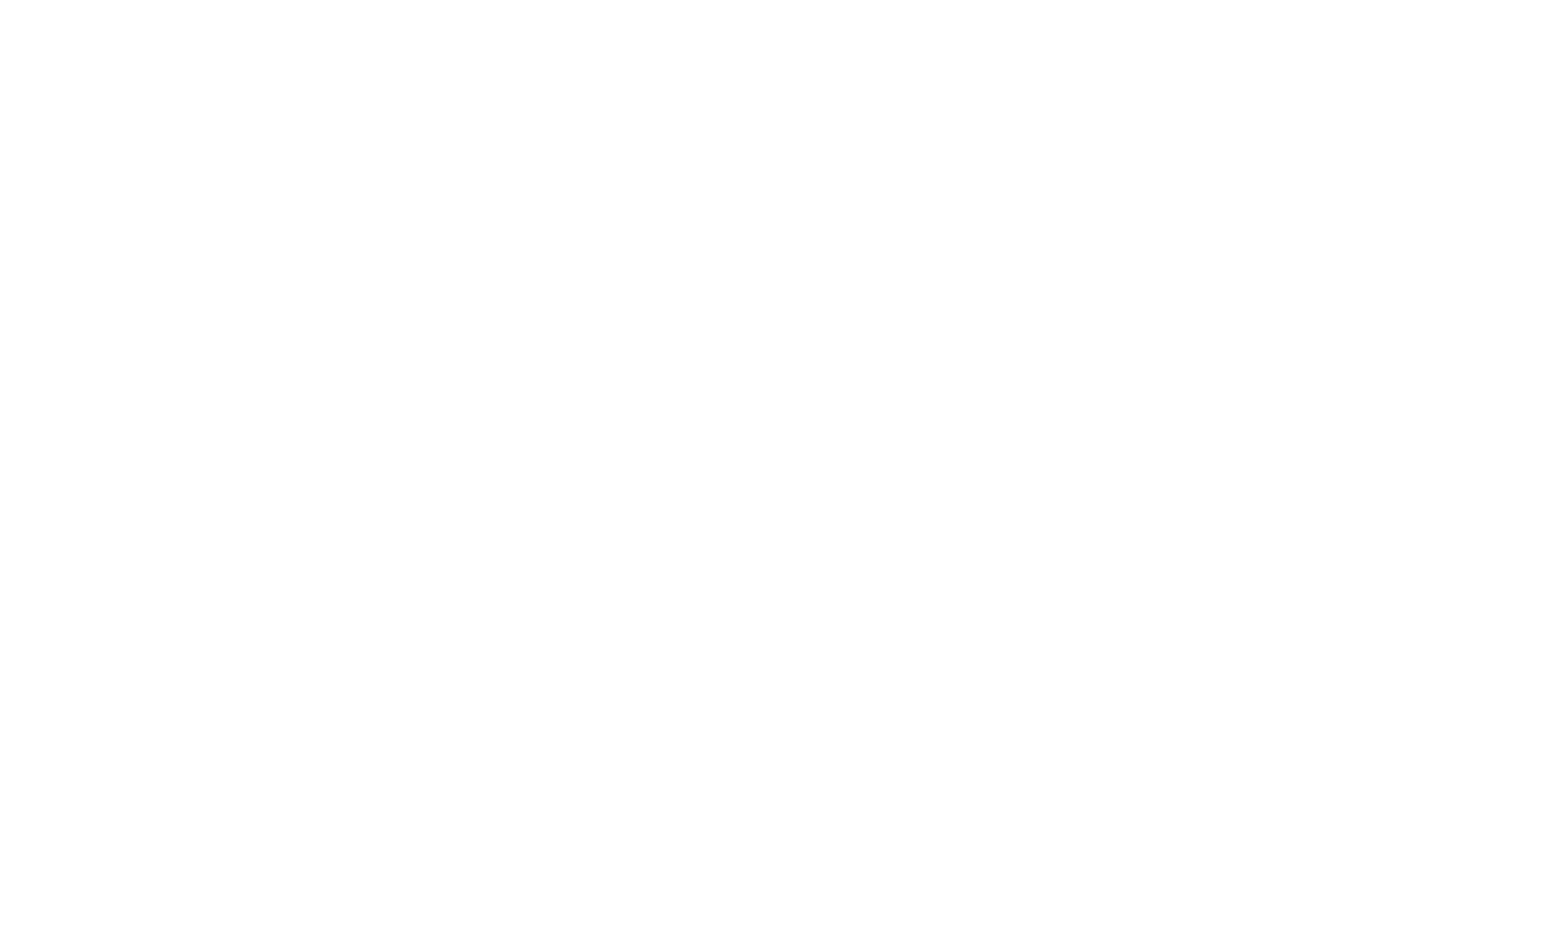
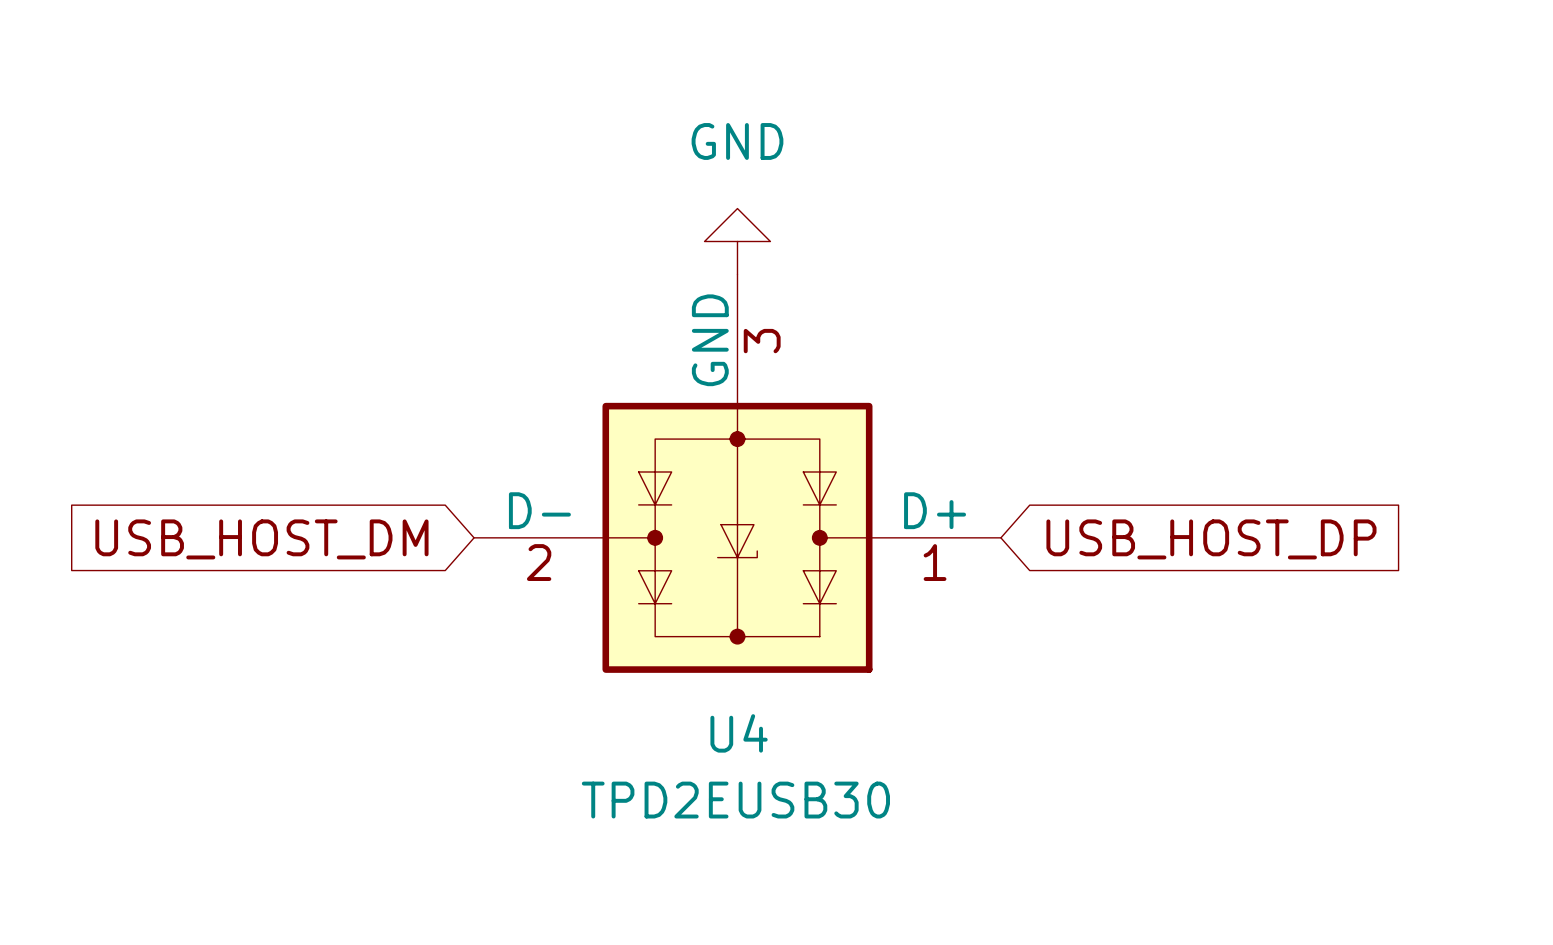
power symbol: none -> GND (737, 241)
U4: none -> TPD2EUSB30 (737, 473)
global label: none -> USB_HOST_DM (261, 539)
global label: none -> USB_HOST_DP (1211, 539)

